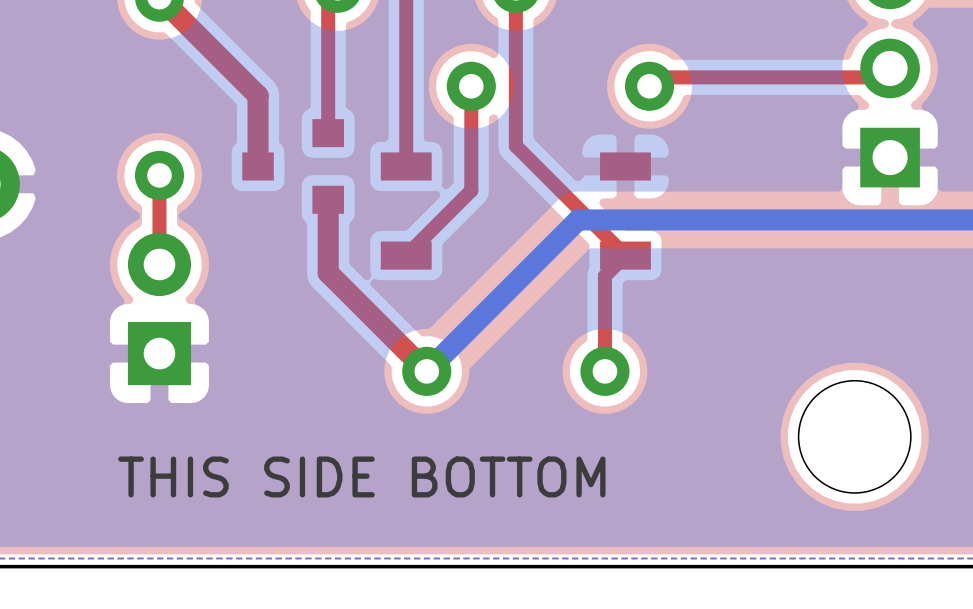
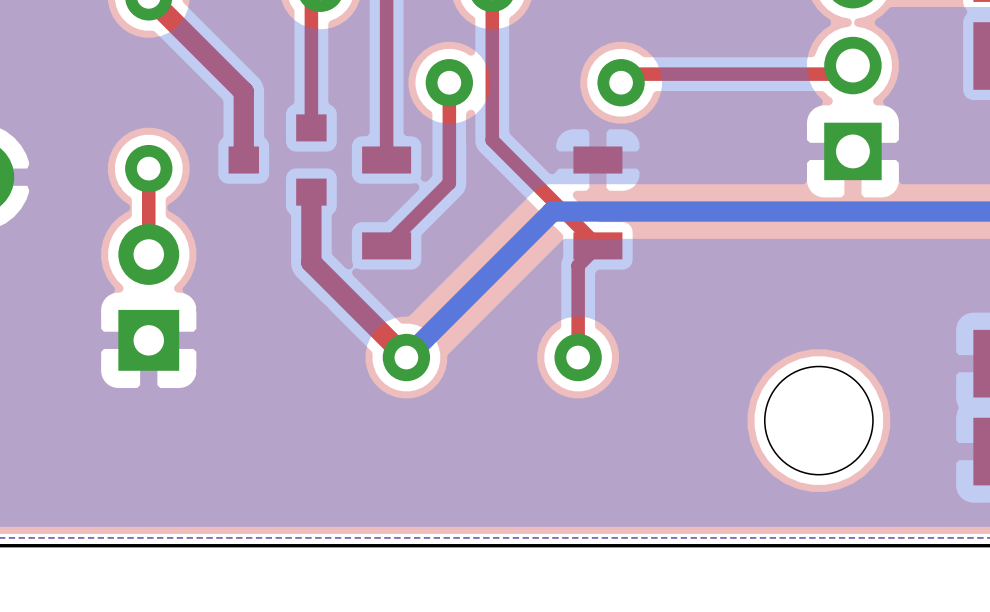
text: THIS SIDE BOTTOM (361, 476) -> none

